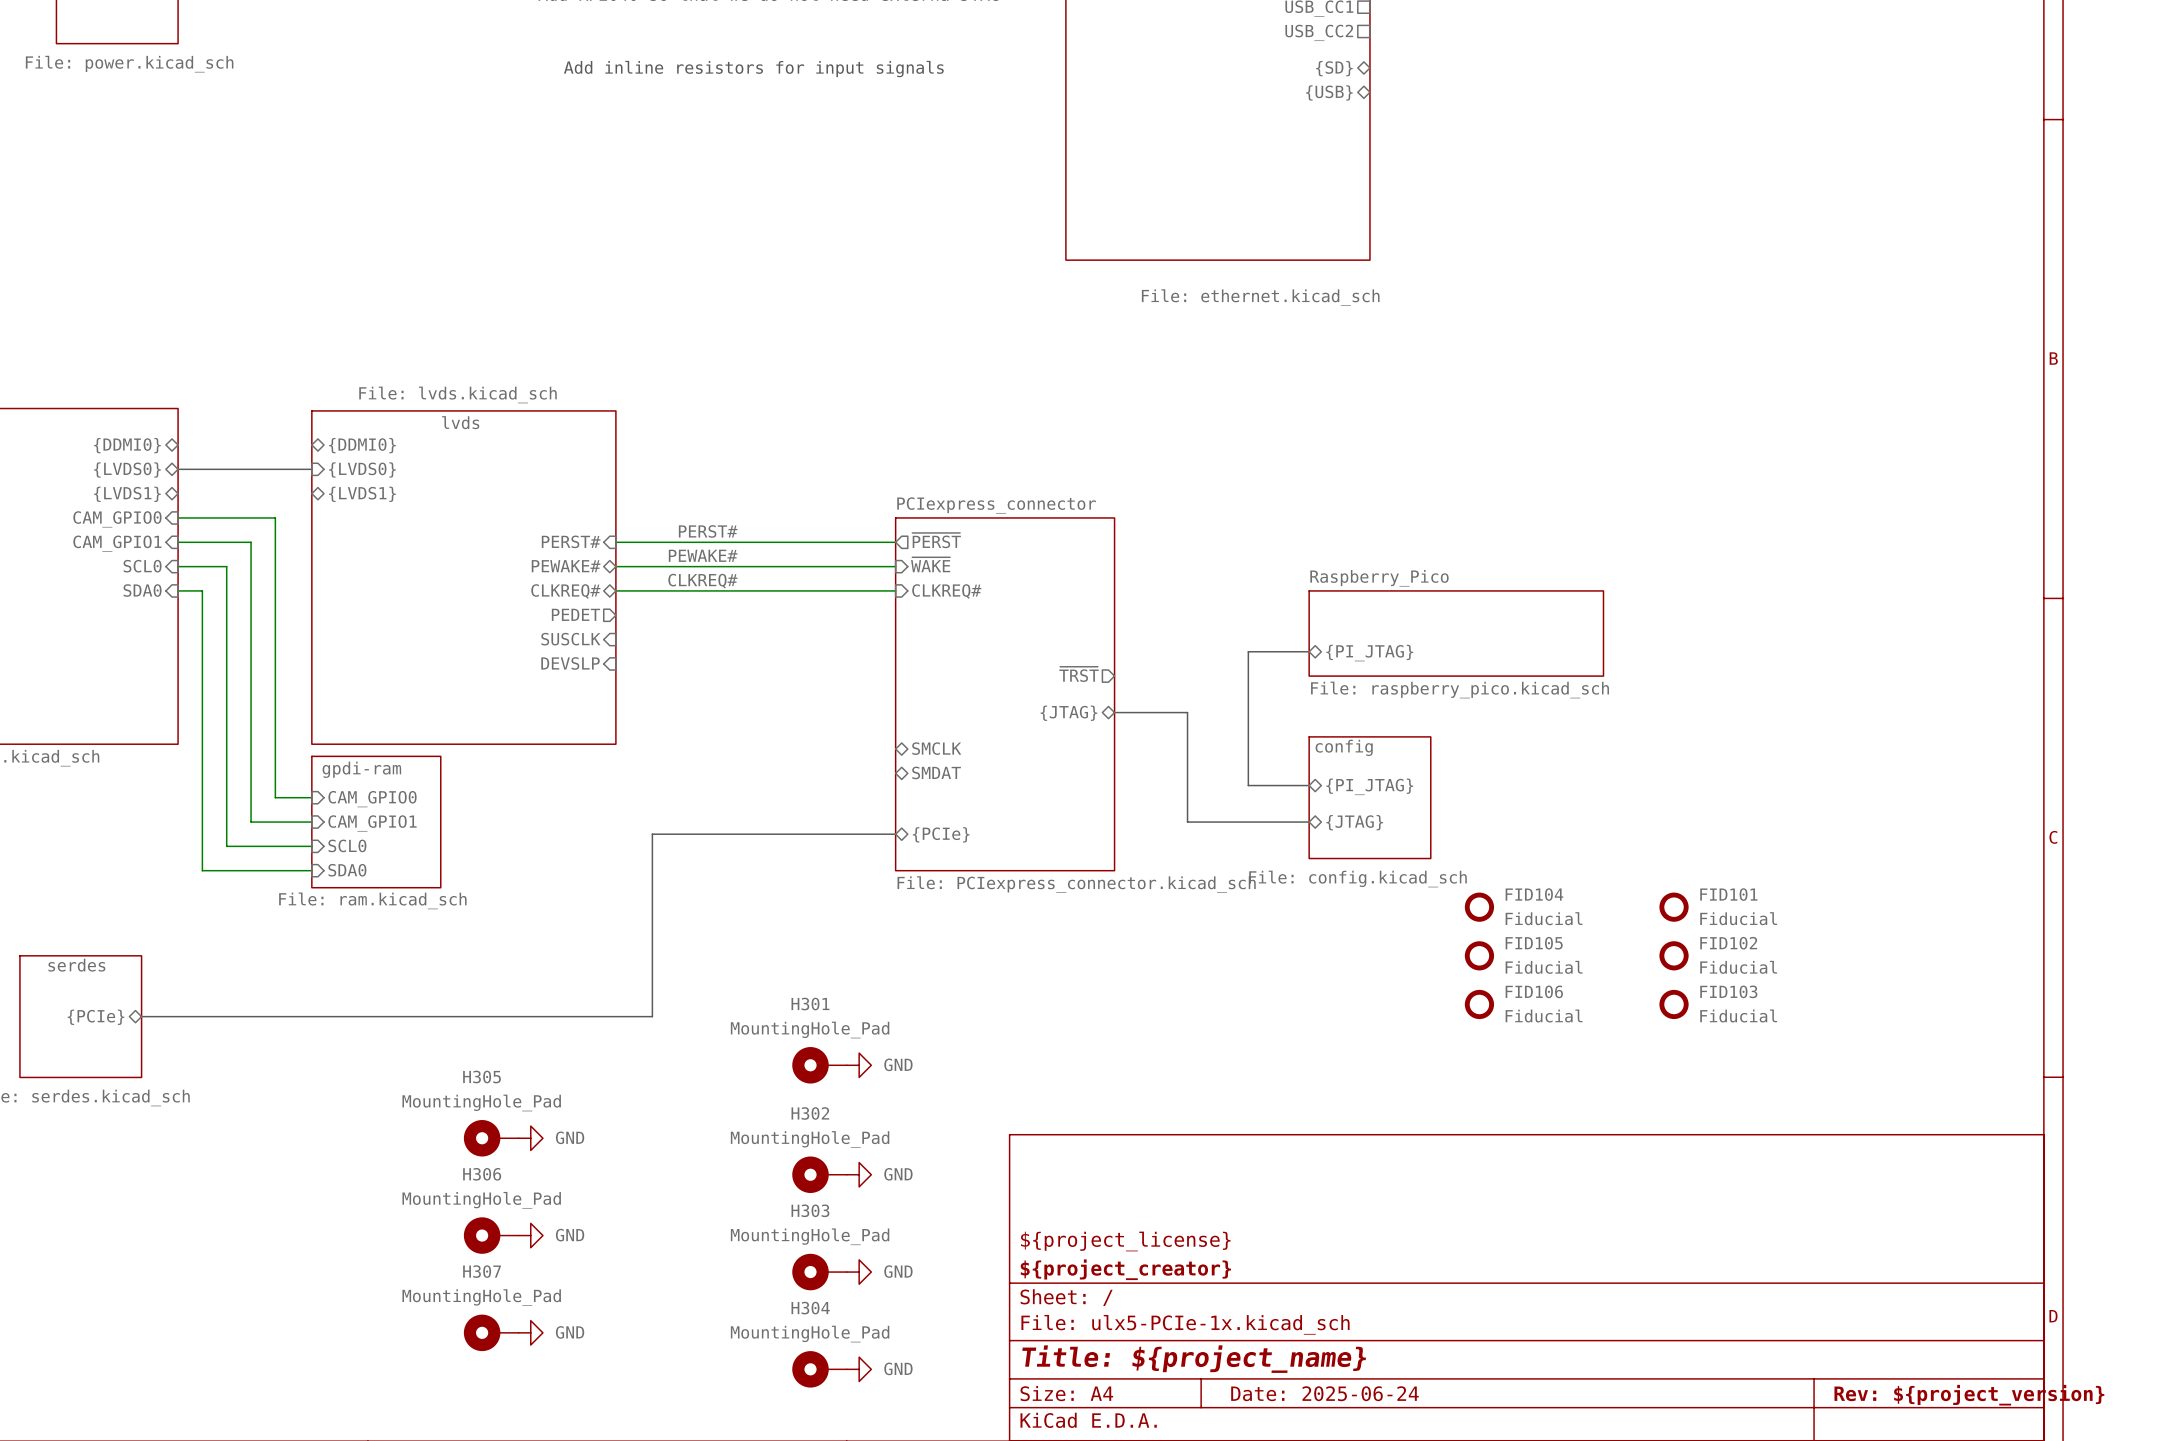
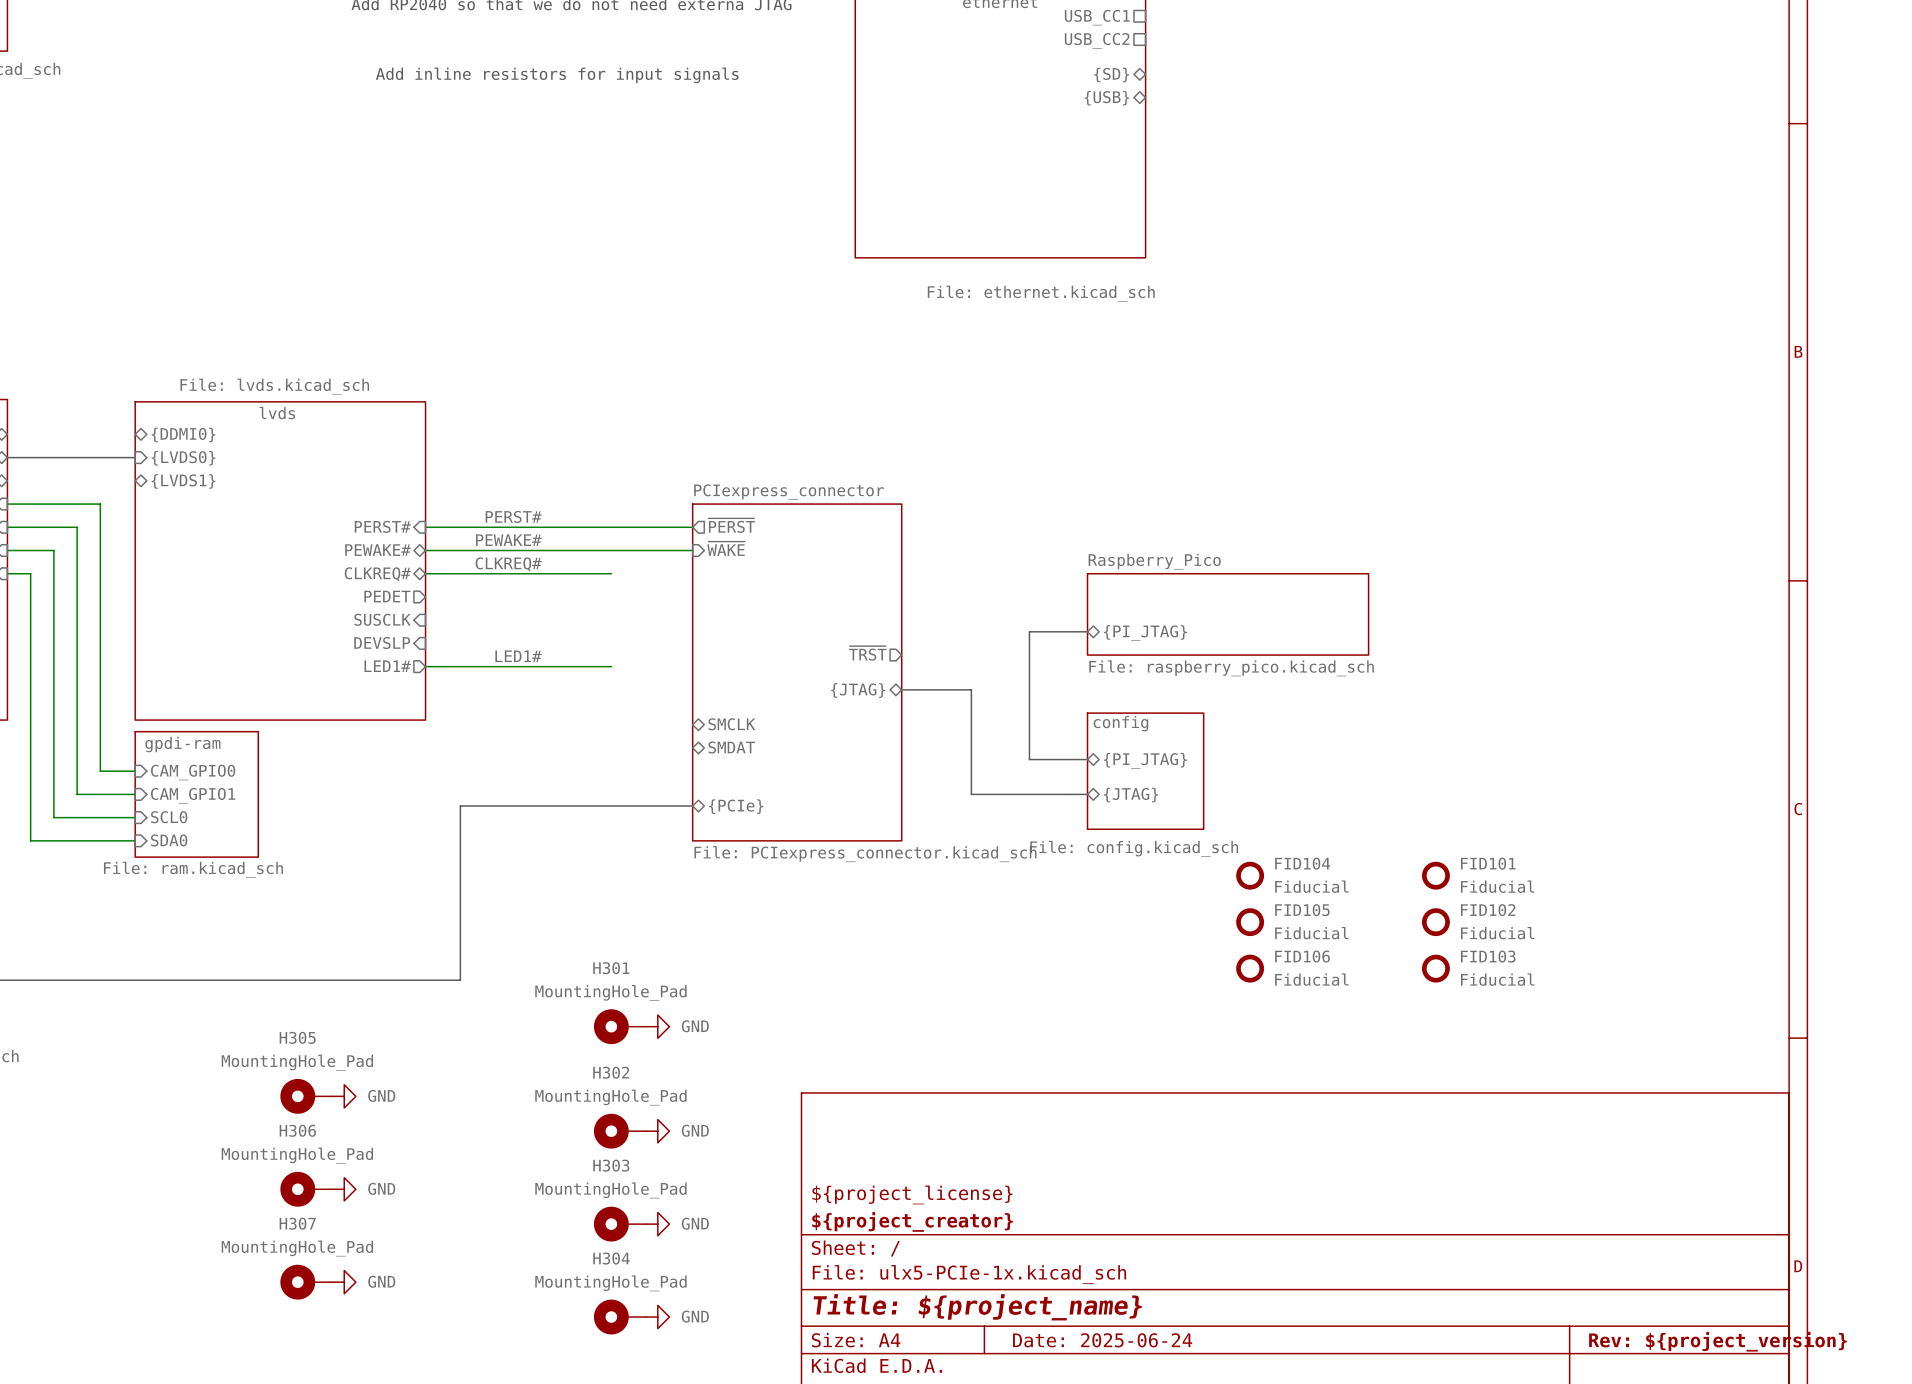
wire: (810, 590) (895, 590) -> none
sheet pin: CLKREQ# (946, 591) -> none
label: none -> LED1# (518, 656)
sheet pin: none -> LED1# (387, 666)
wire: none -> (425, 666) (611, 666)

